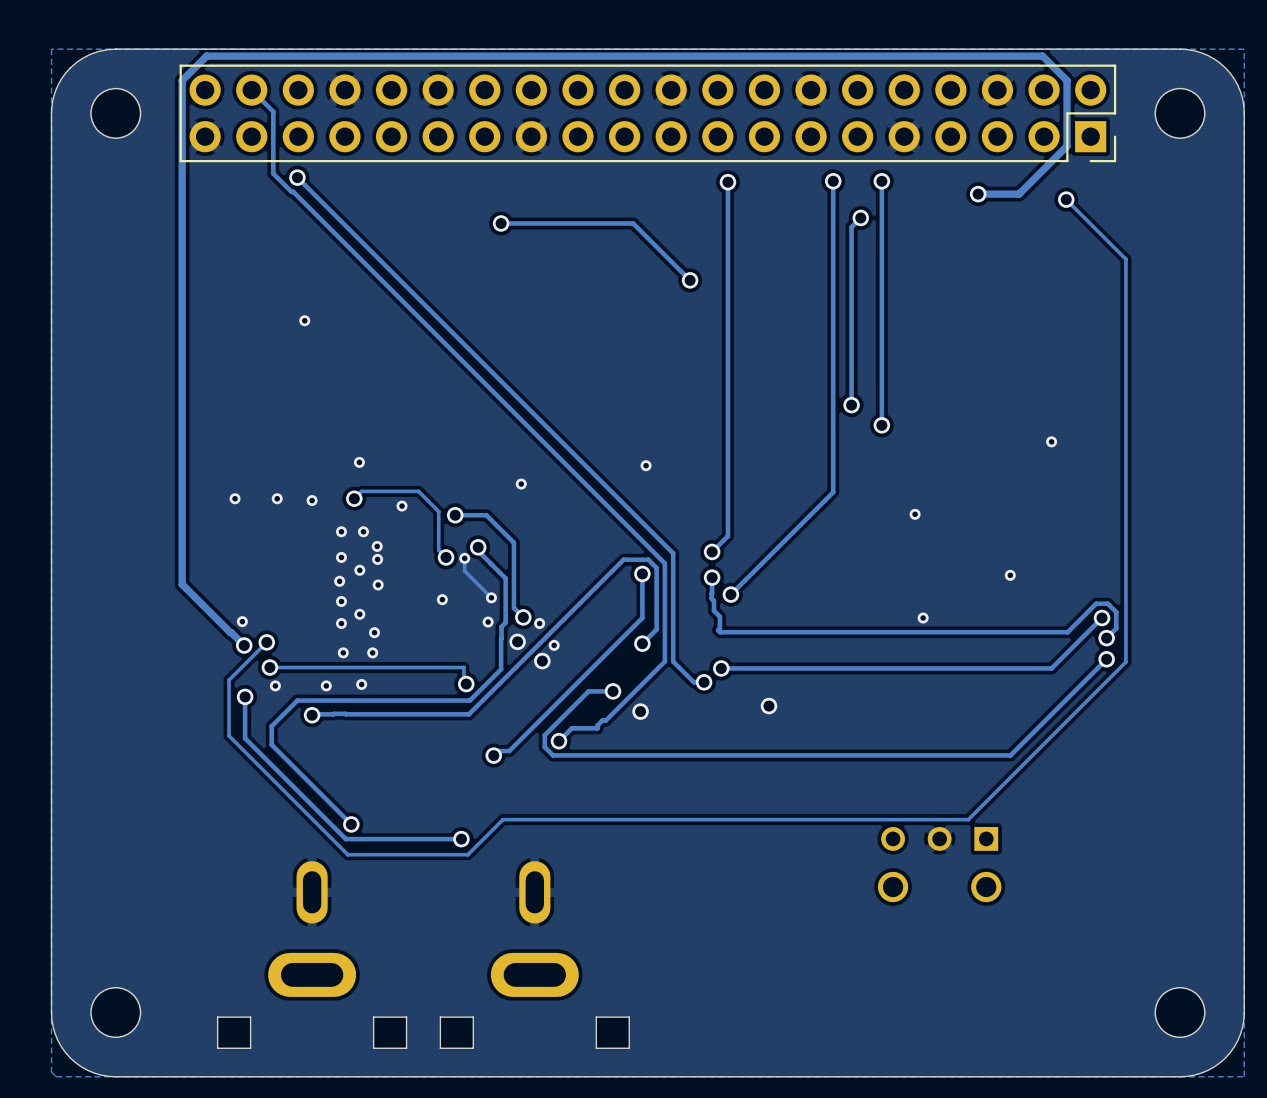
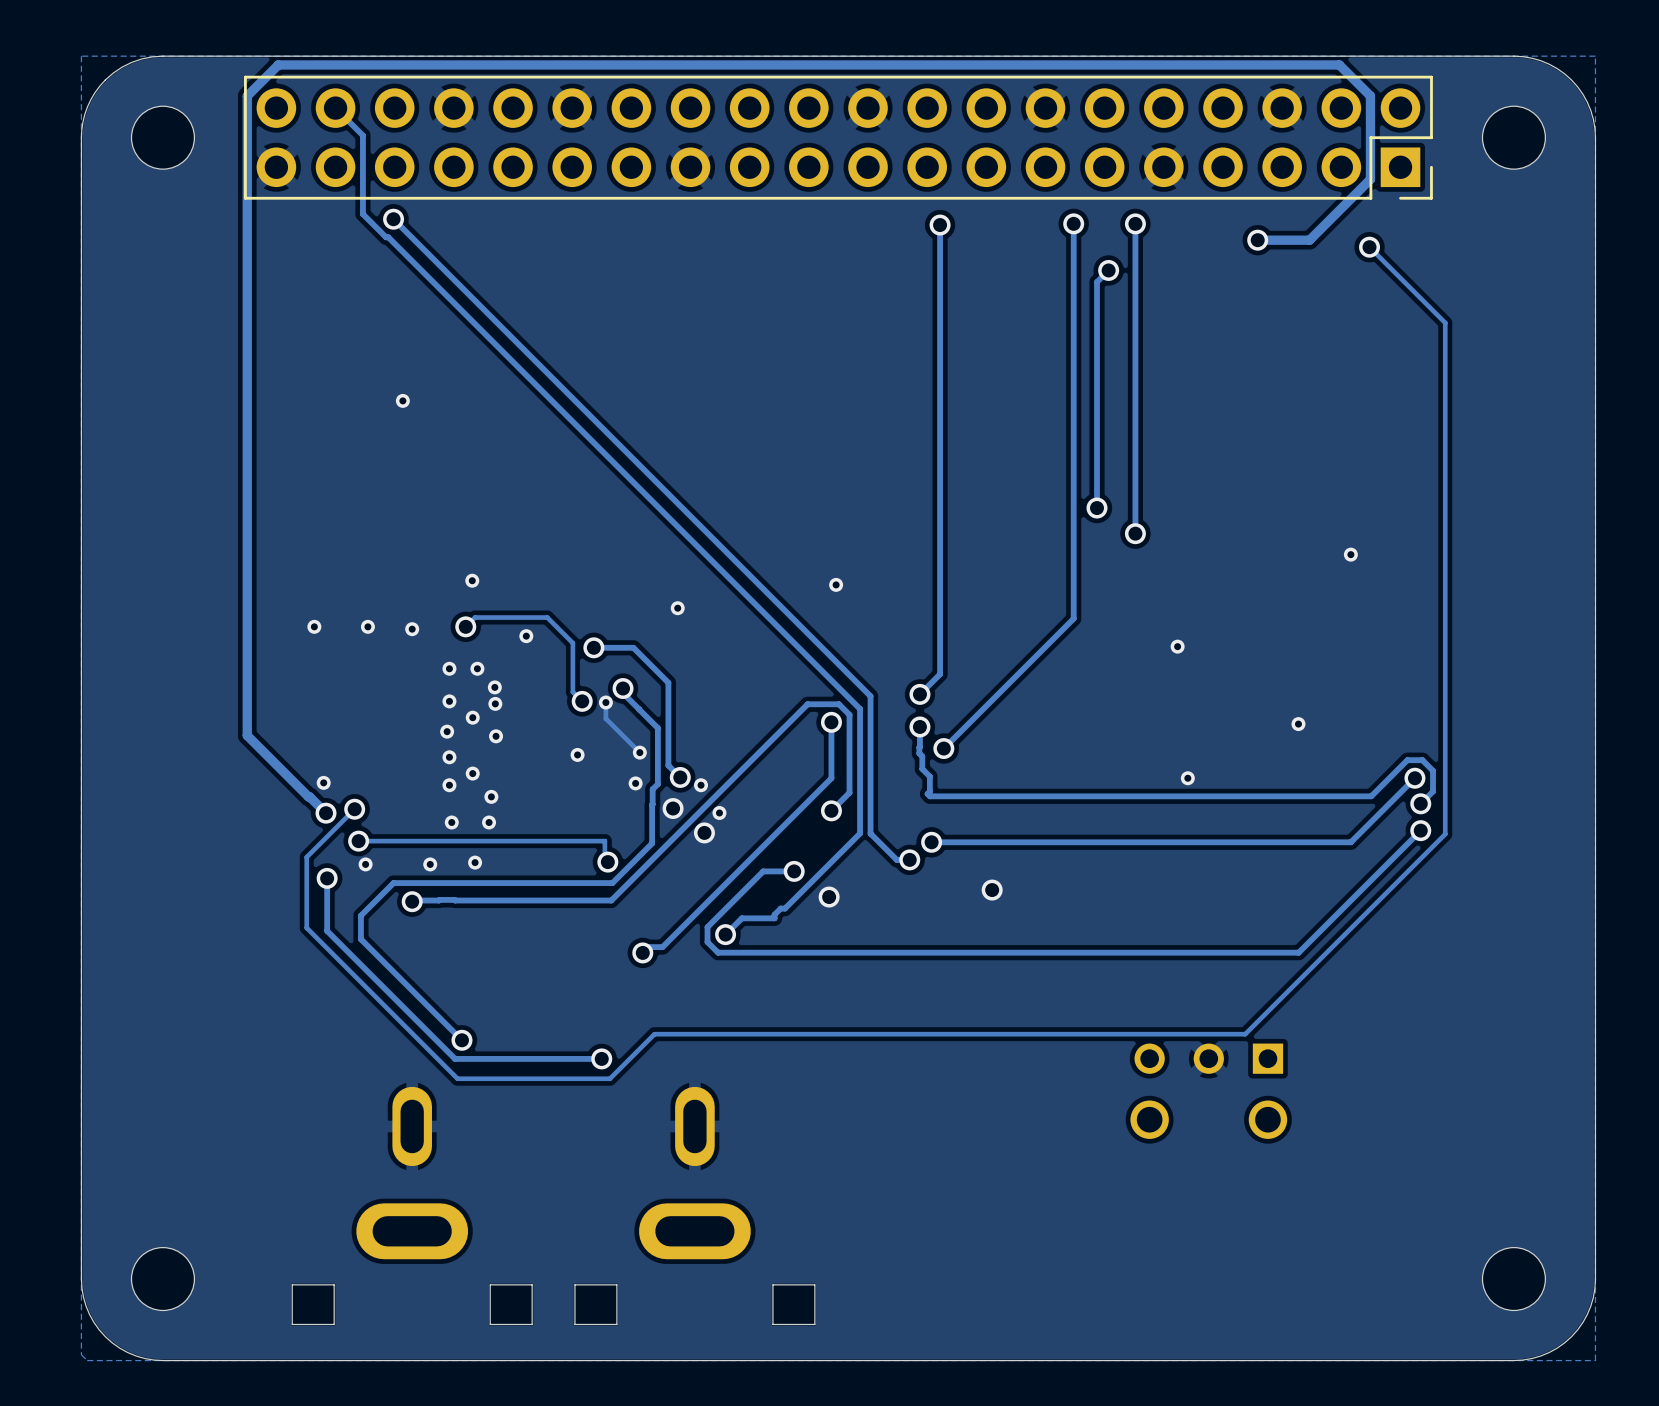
track: (501, 223) (633, 223) (690, 280) -> none
via: (501, 223) -> none
via: (690, 280) -> none

